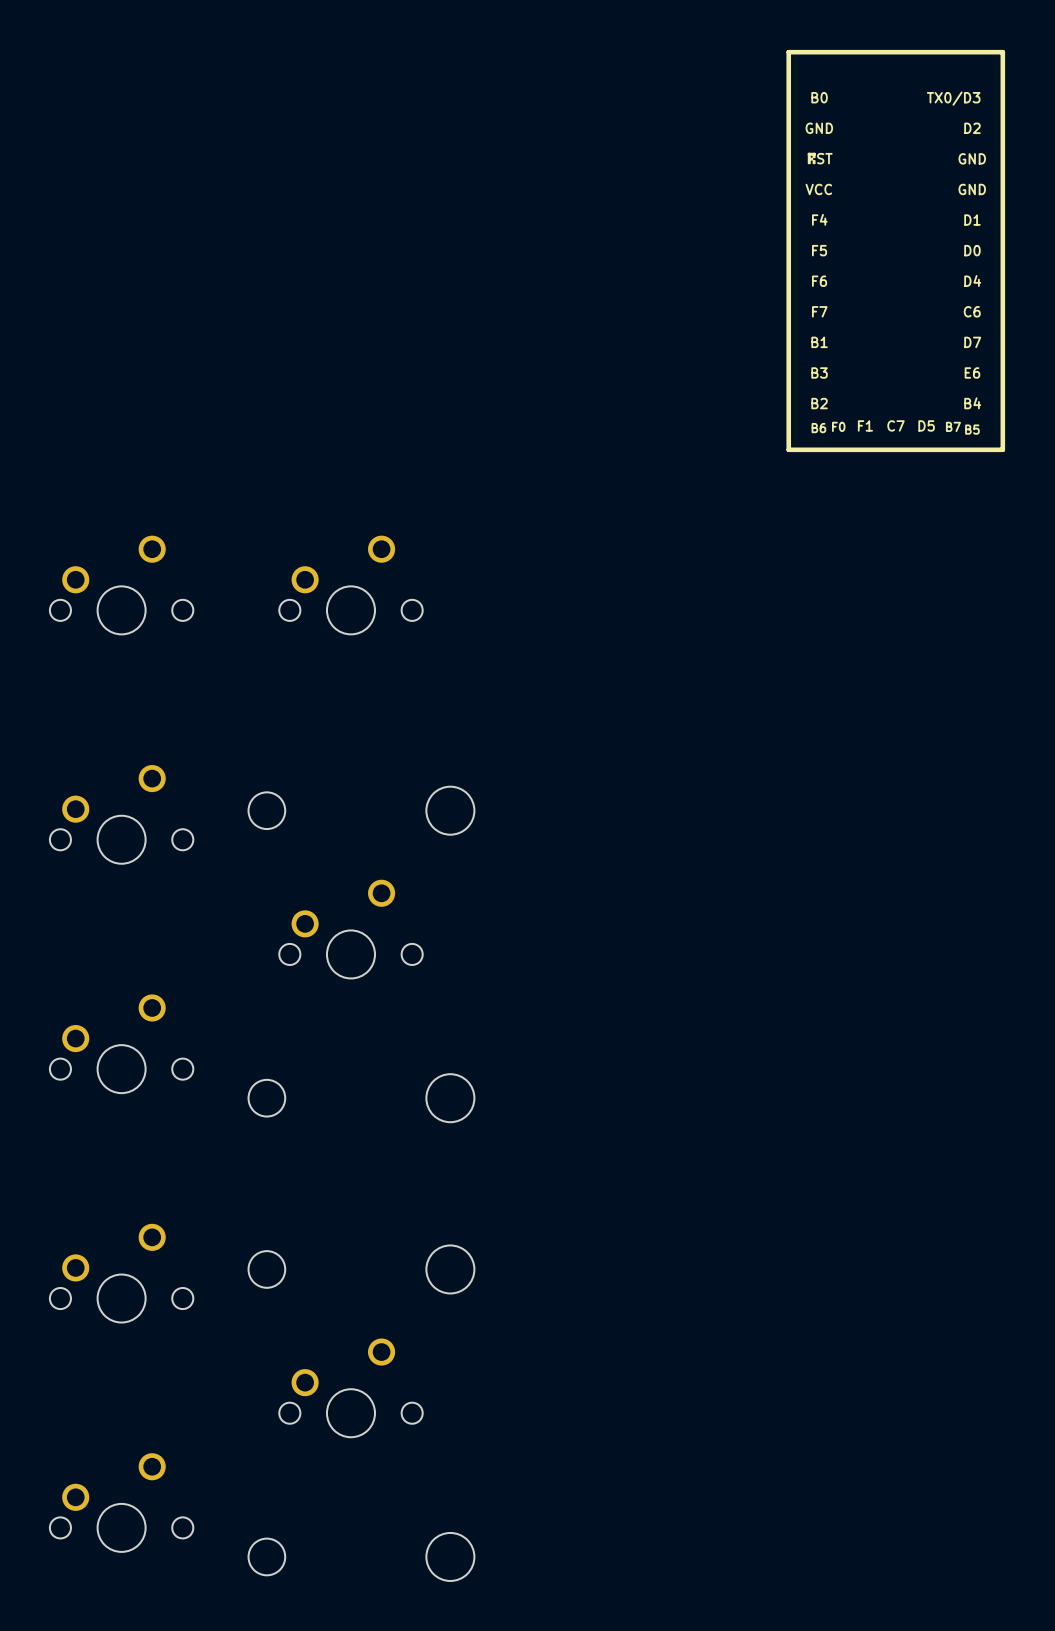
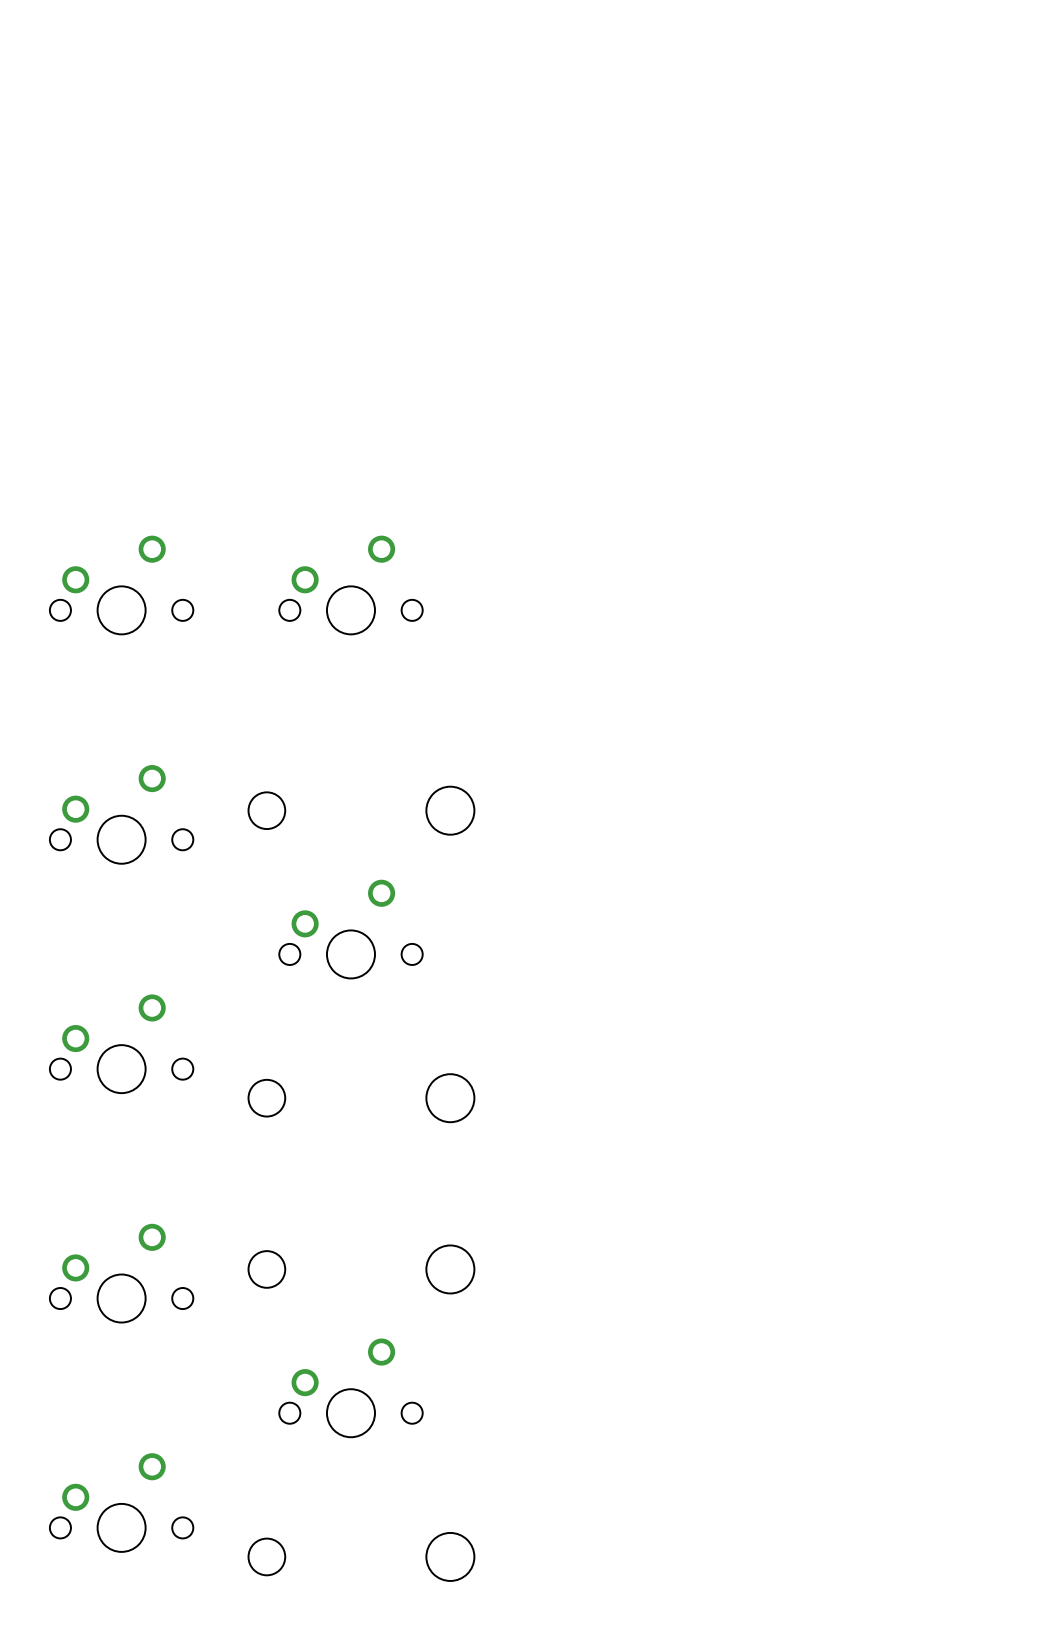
part: (895, 250) -> none

